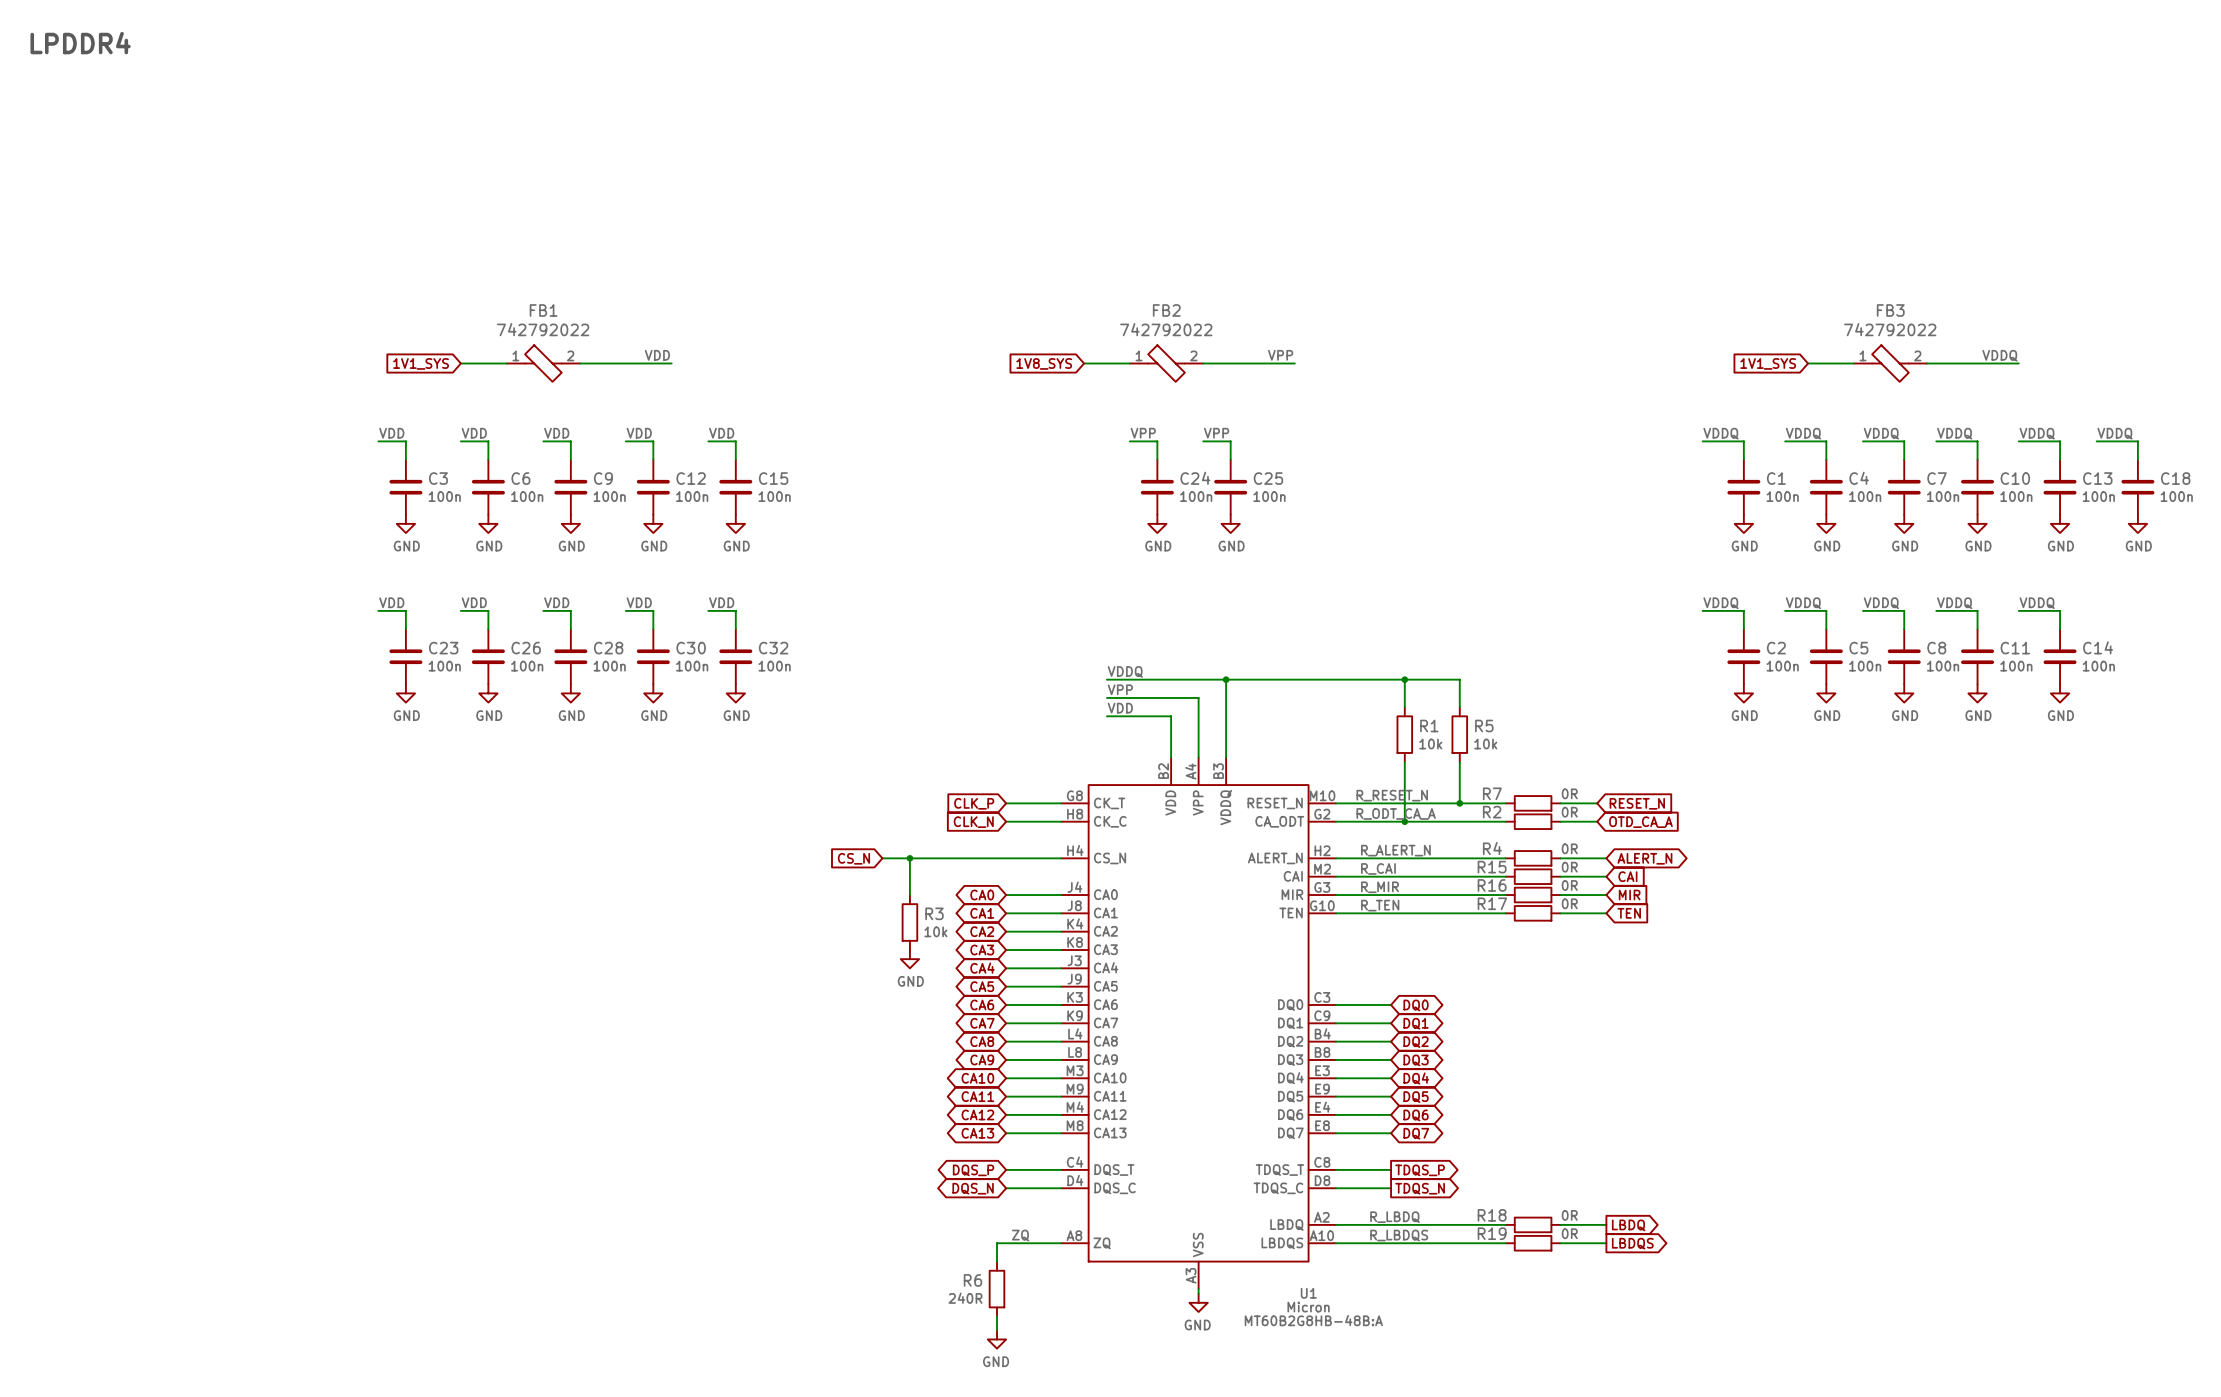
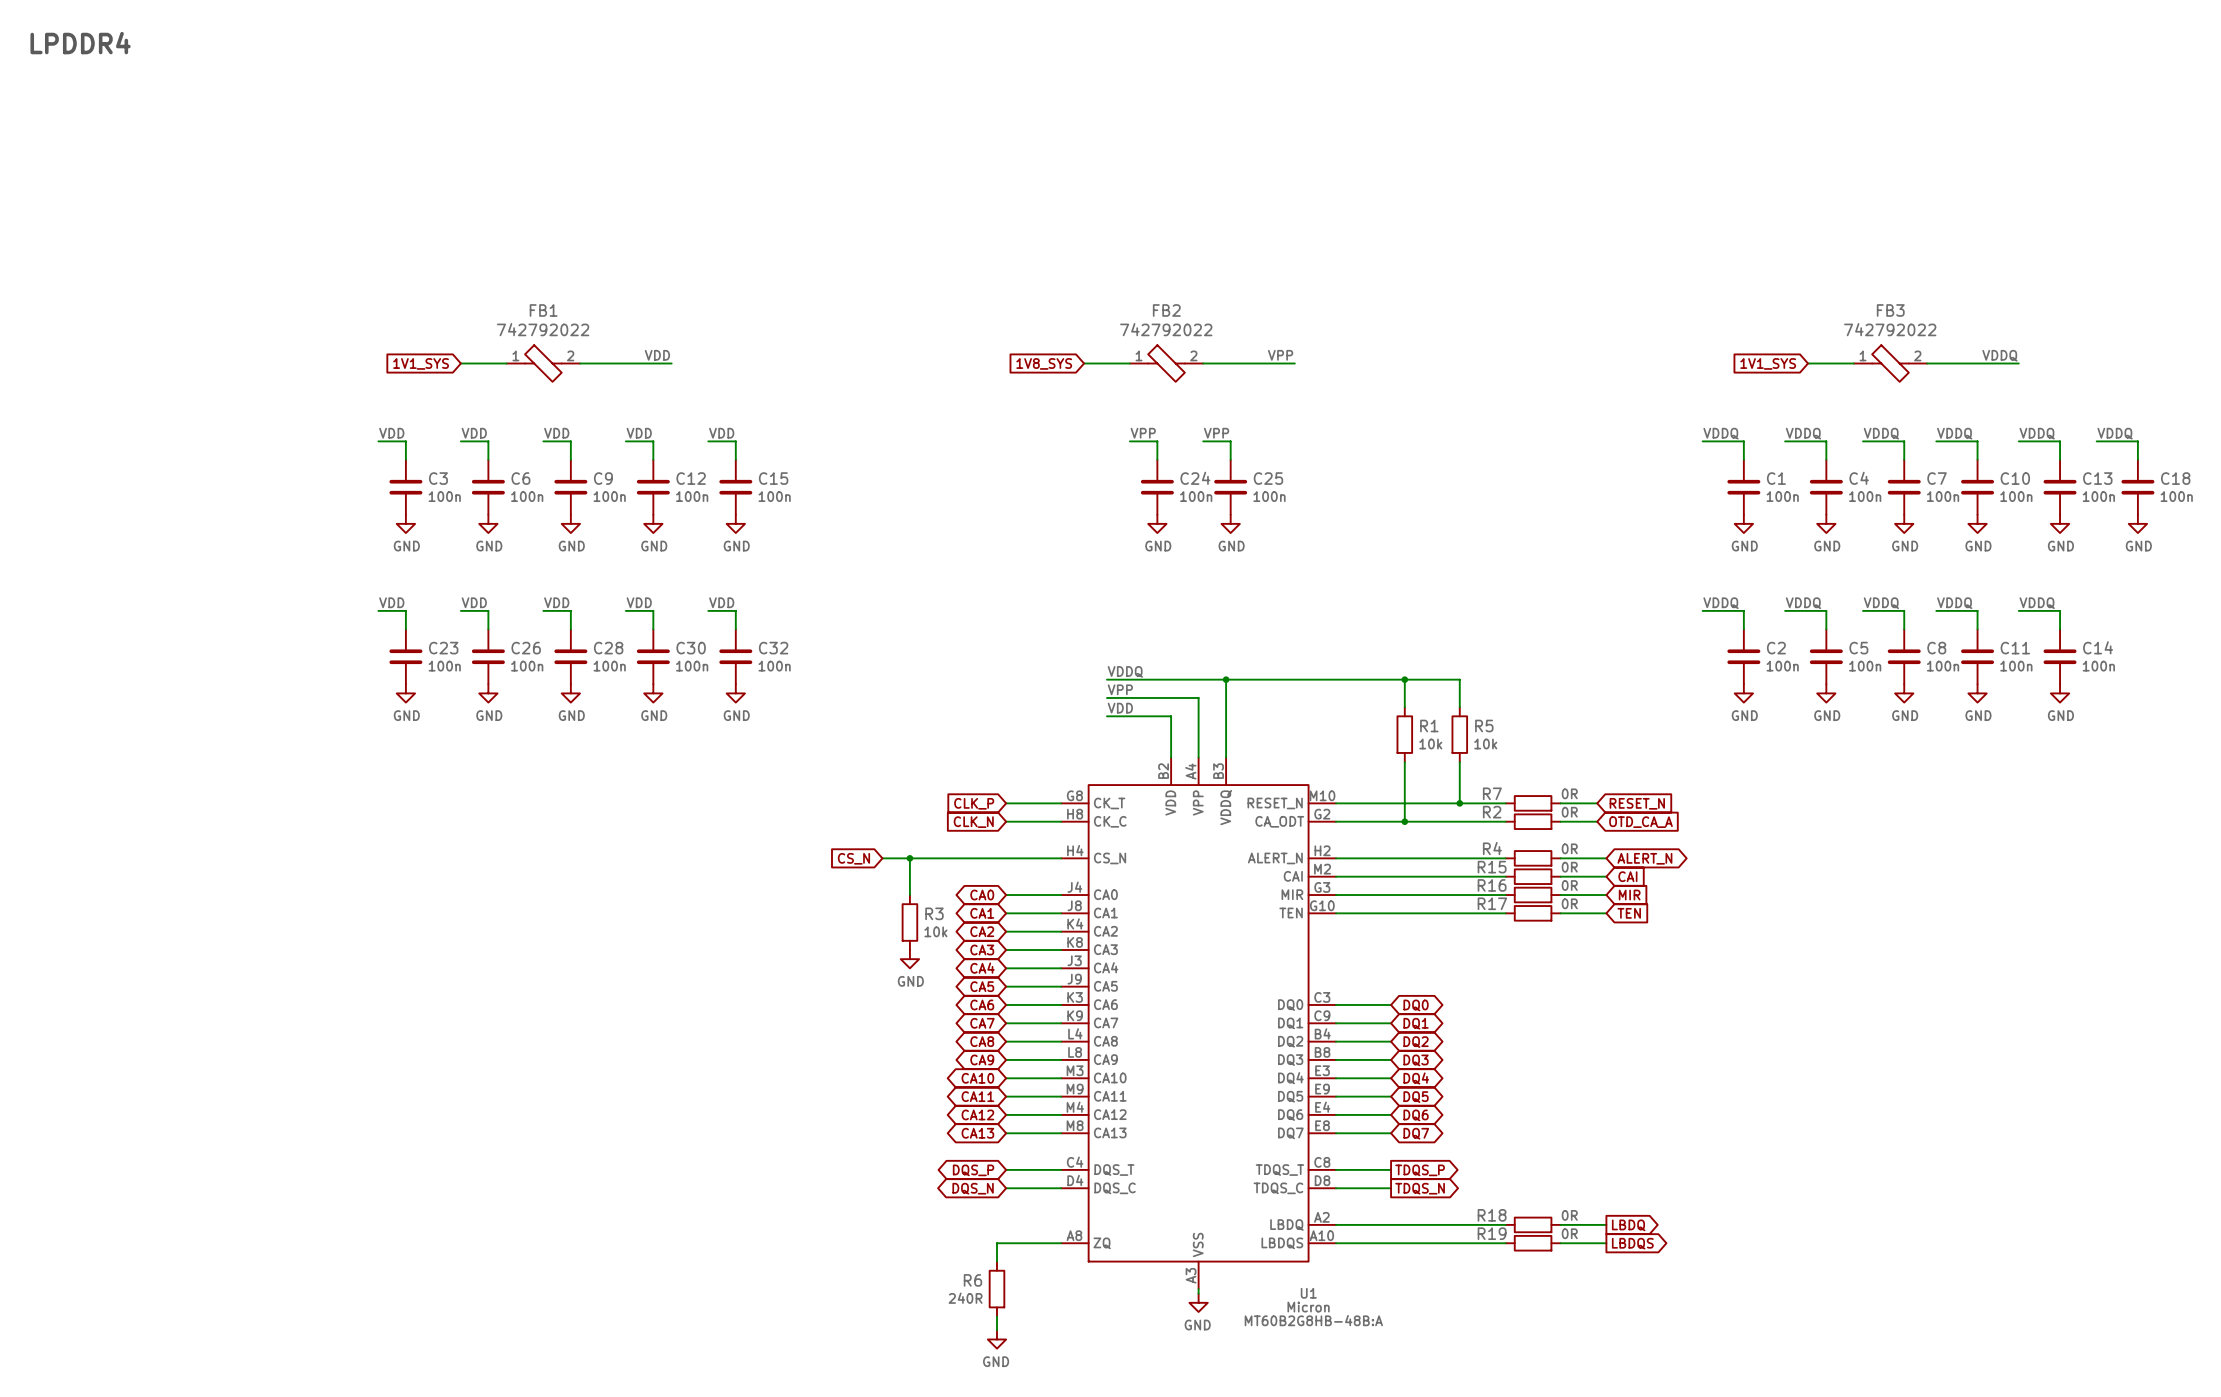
label: R_RESET_N (1392, 795) -> none
label: R_ODT_CA_A (1396, 813) -> none
label: R_ALERT_N (1395, 850) -> none
label: R_CAI (1378, 868) -> none
label: R_MIR (1379, 887) -> none
label: R_TEN (1380, 905) -> none
label: R_LBDQ (1395, 1217) -> none
label: ZQ (1020, 1235) -> none
label: R_LBDQS (1399, 1235) -> none

